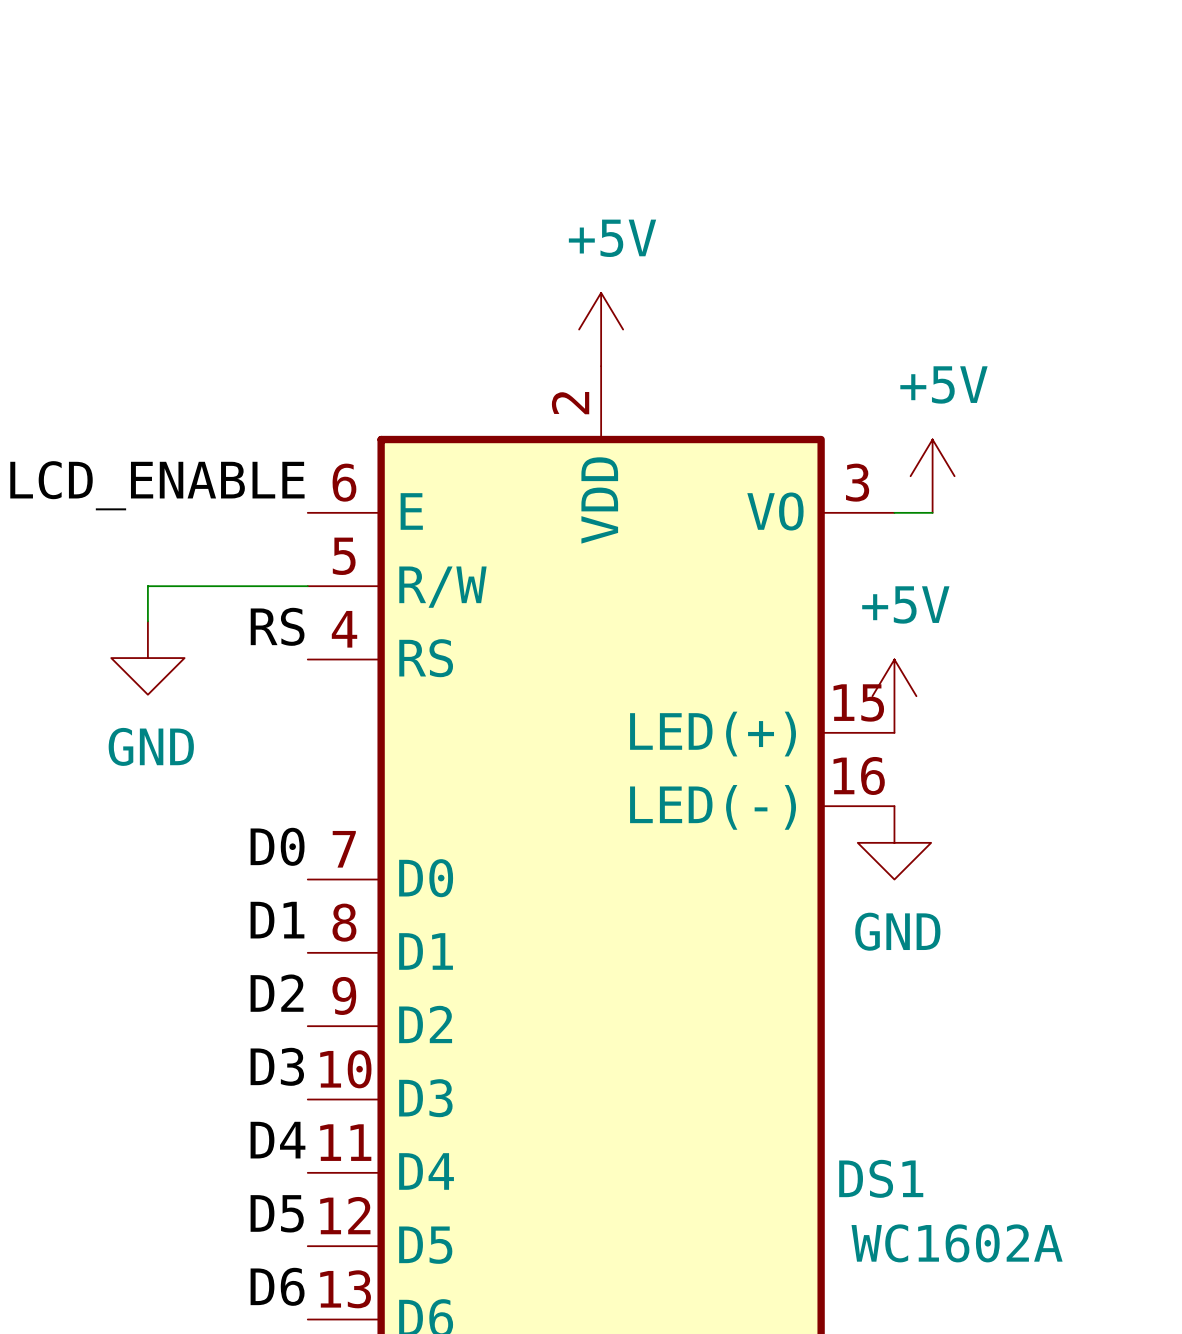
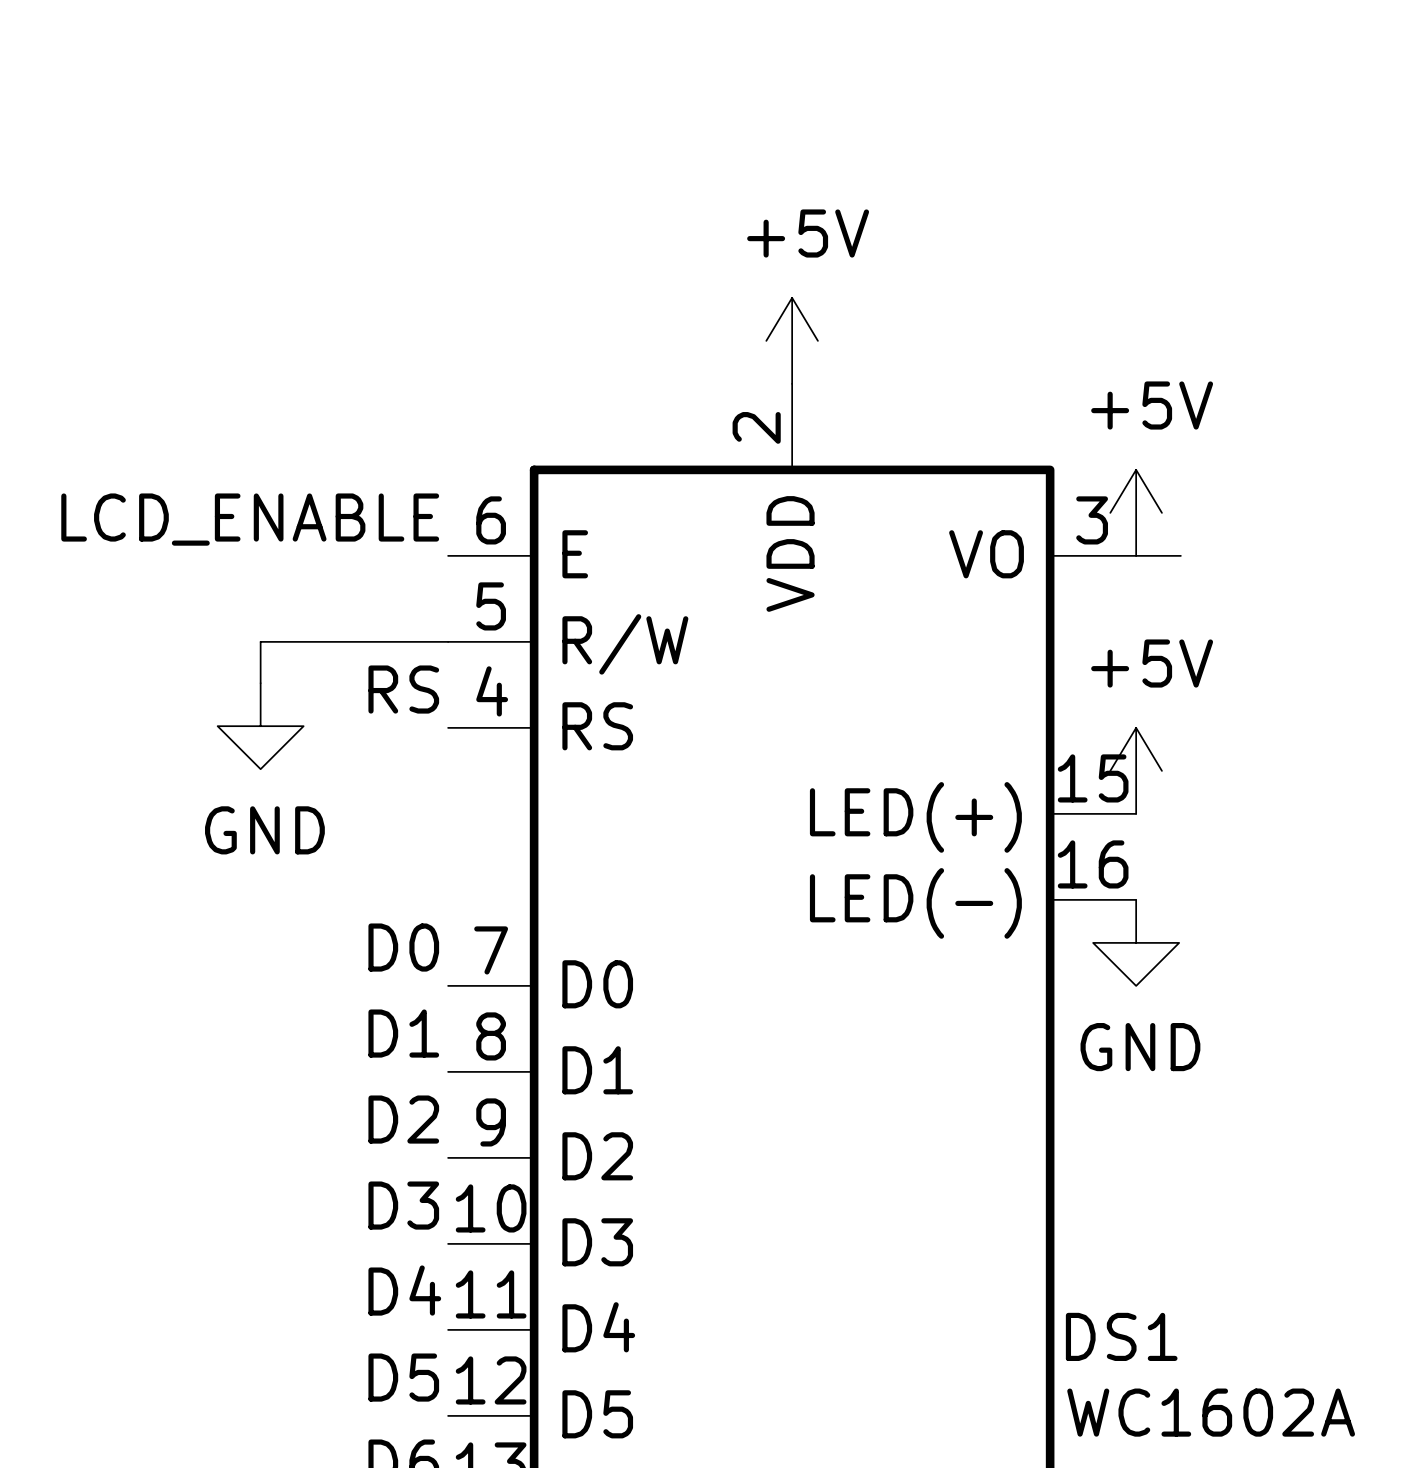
power symbol position: +5V (932, 476) -> +5V (1136, 512)

